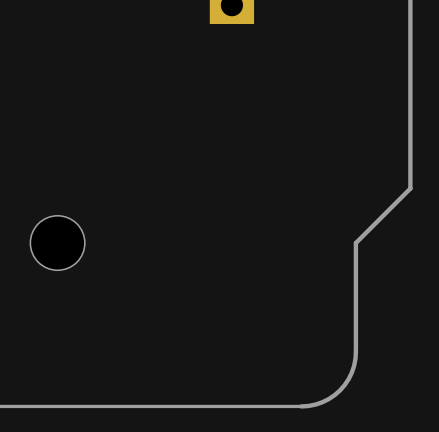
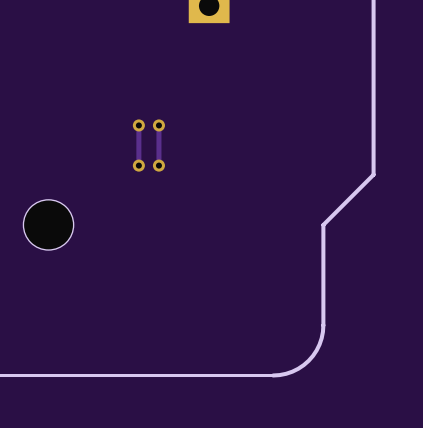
track: none -> (138, 125) (138, 165)
via: none -> (138, 125)
track: none -> (158, 125) (158, 165)
via: none -> (158, 125)
via: none -> (138, 165)
via: none -> (158, 165)

